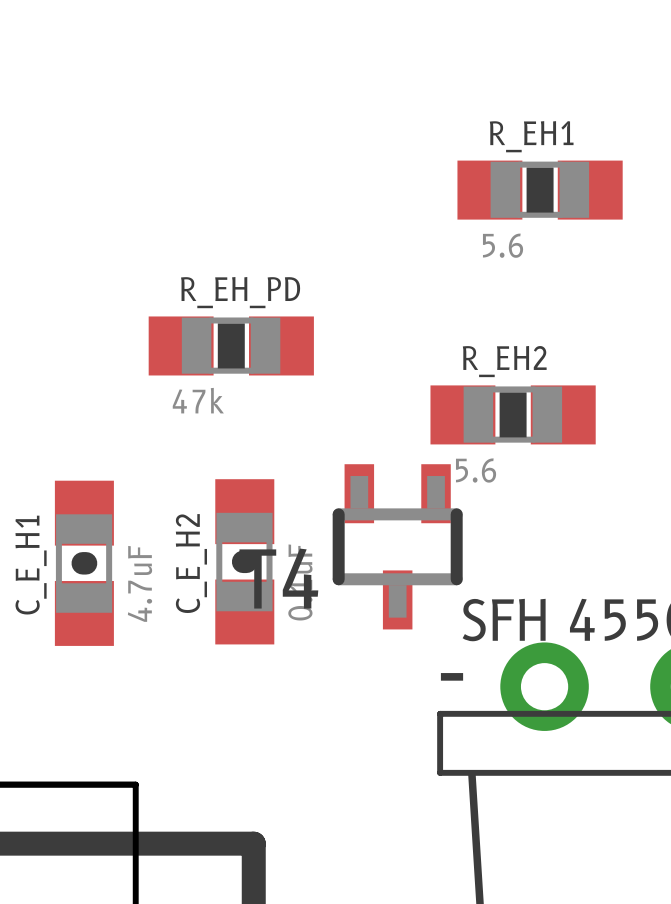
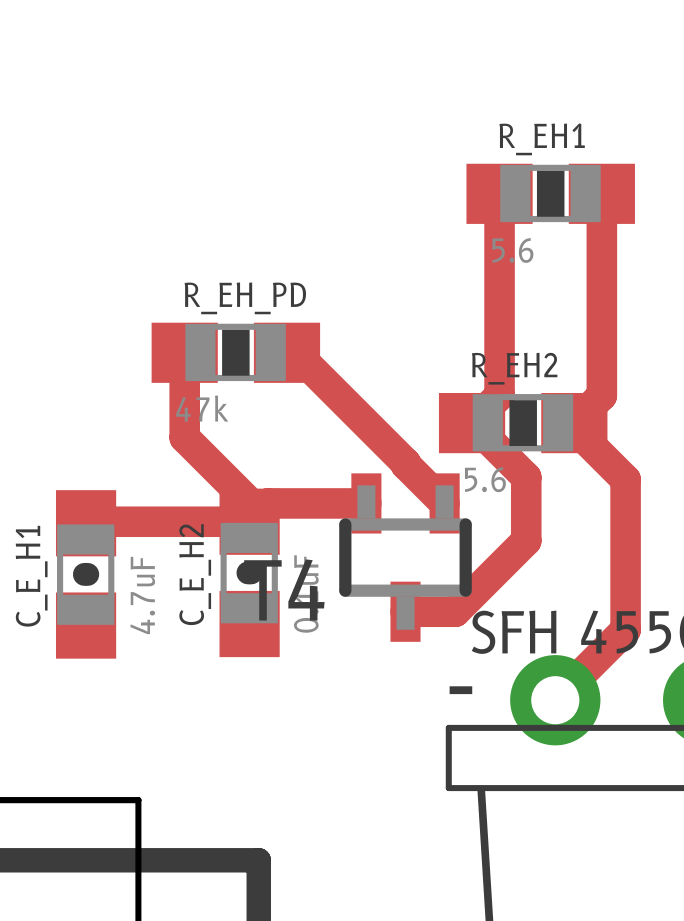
top track: none -> (499, 193) (499, 395) (472, 423) (526, 477) (526, 540) (455, 611) (405, 611)
top track: none -> (601, 193) (601, 395) (574, 423) (574, 428) (625, 479) (625, 629) (555, 700)
top track: none -> (184, 352) (184, 437) (259, 512)
top track: none -> (287, 352) (295, 352) (444, 503)
top track: none -> (366, 503) (267, 503) (249, 521) (87, 521) (86, 523)

